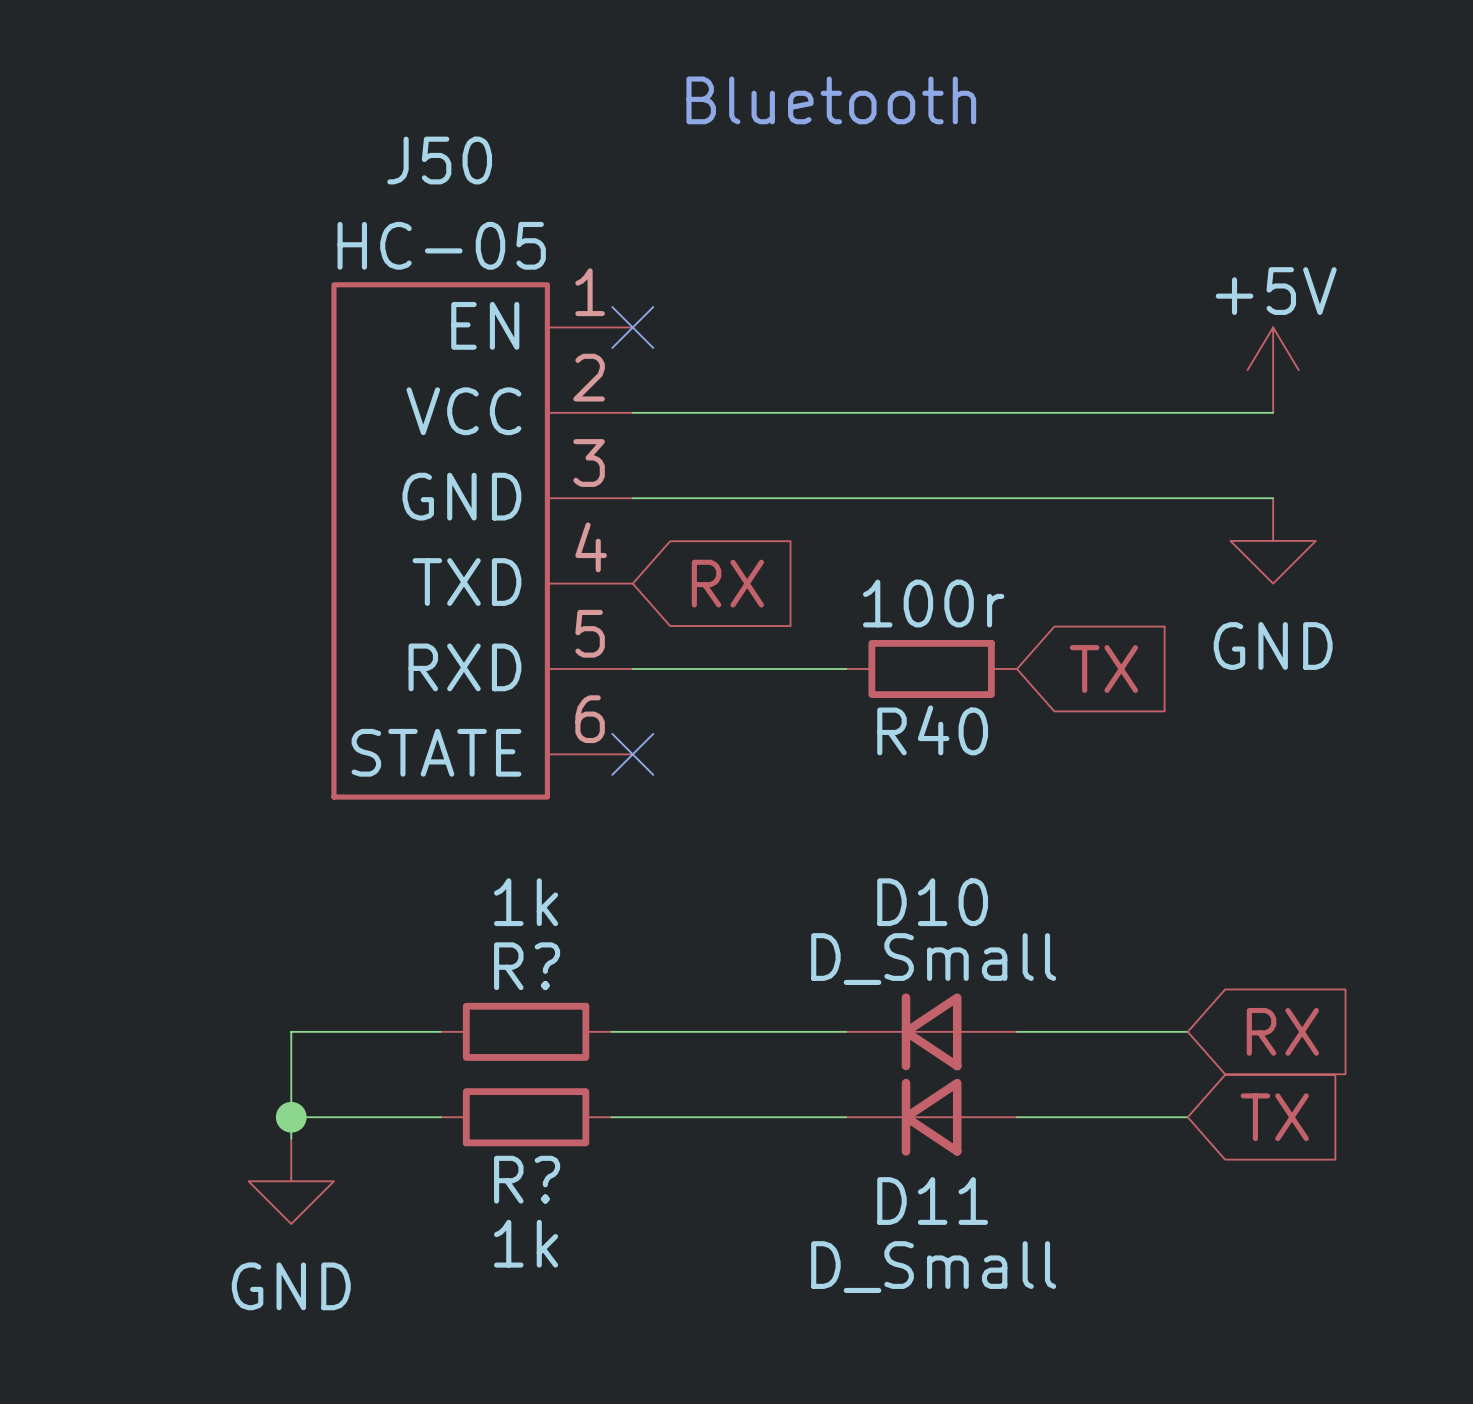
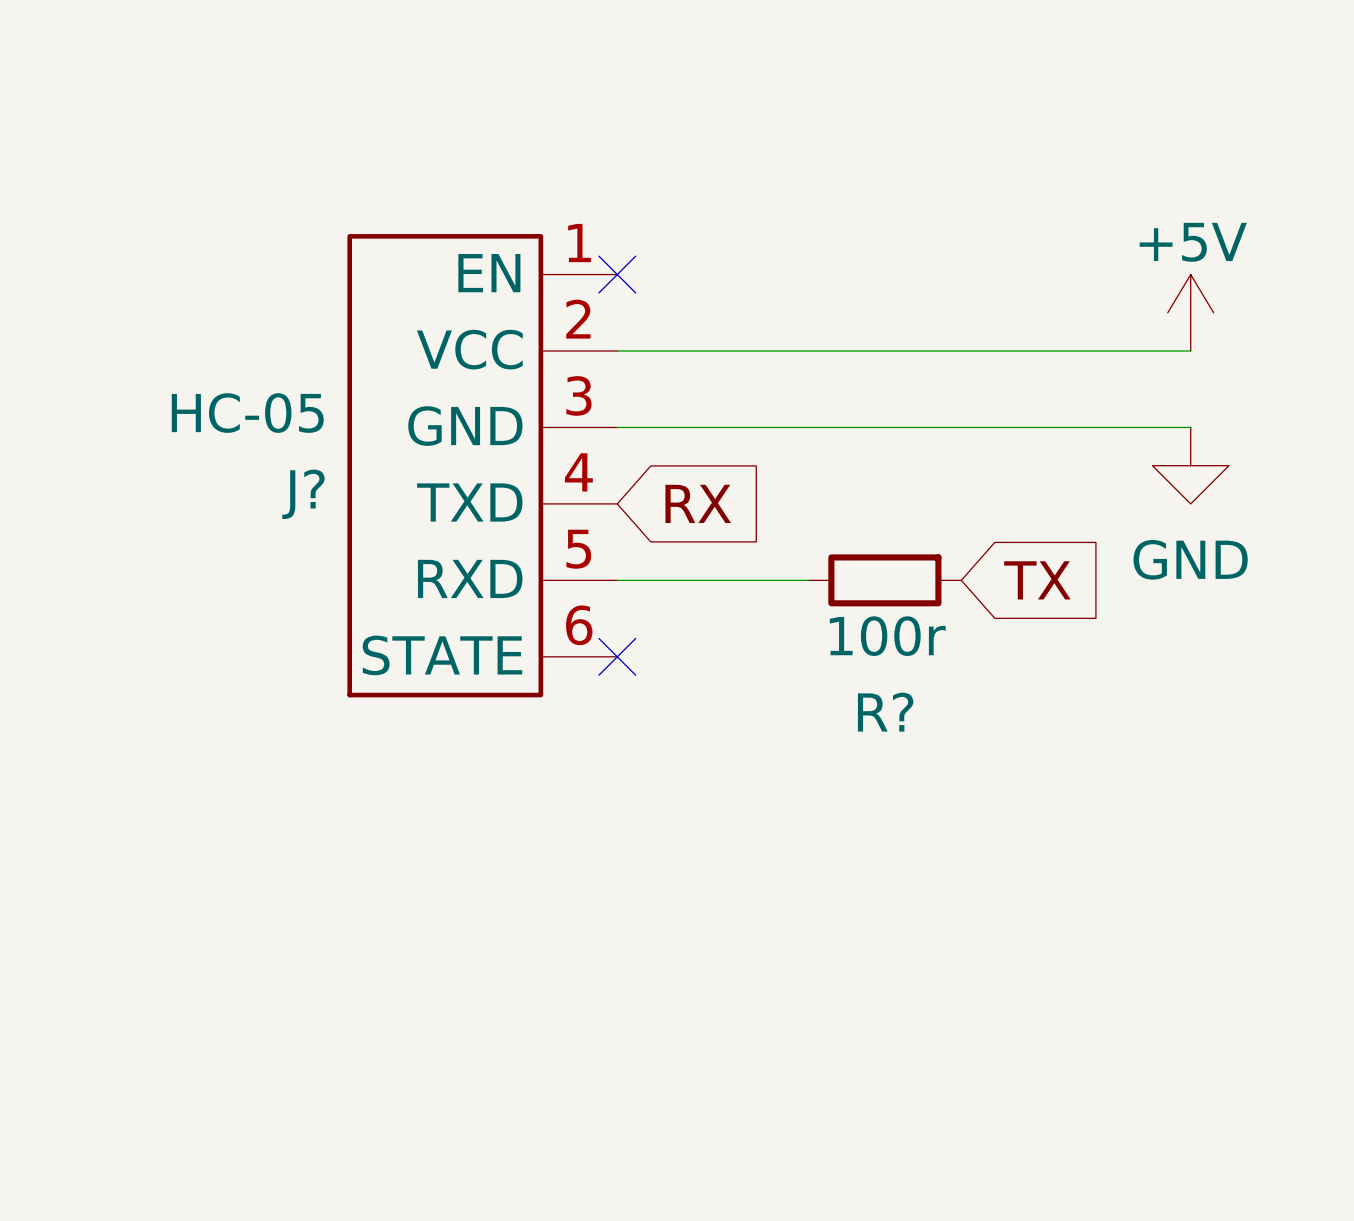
text: Bluetooth (831, 100) -> none
J50 name: J50 (439, 160) -> J? (303, 494)
J50 value position: HC-05 (441, 245) -> HC-05 (247, 413)
R40 value position: 100r (933, 603) -> 100r (887, 636)
R40 name: R40 (932, 730) -> R? (885, 712)
wire: (440, 1031) (291, 1031) (291, 1138) -> none
R?: 1k (526, 1031) -> none
wire: (611, 1031) (846, 1031) -> none
D10: D_Small (931, 1031) -> none
wire: (1017, 1031) (1187, 1031) -> none
global label: RX (1282, 1031) -> none
wire: (291, 1117) (440, 1117) -> none
junction: (291, 1117) -> none
R?: 1k (526, 1117) -> none
wire: (611, 1117) (846, 1117) -> none
D11: D_Small (931, 1117) -> none
wire: (1017, 1117) (1187, 1117) -> none
global label: TX (1274, 1117) -> none
power symbol: GND (291, 1181) -> none

